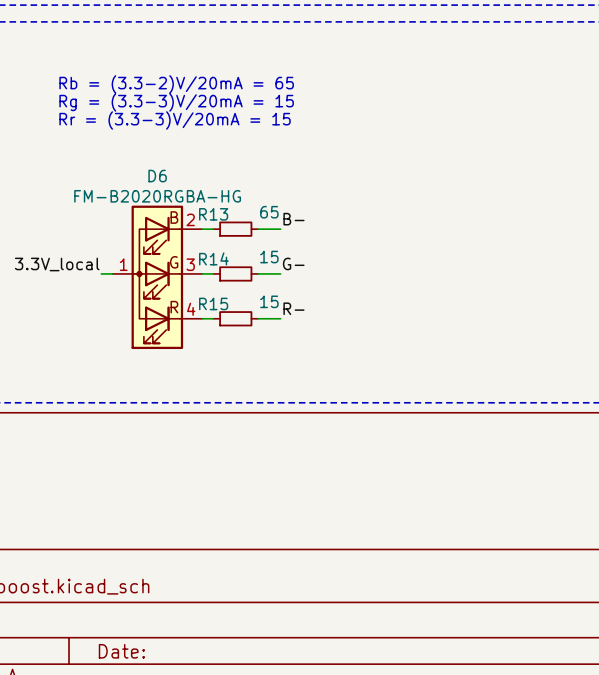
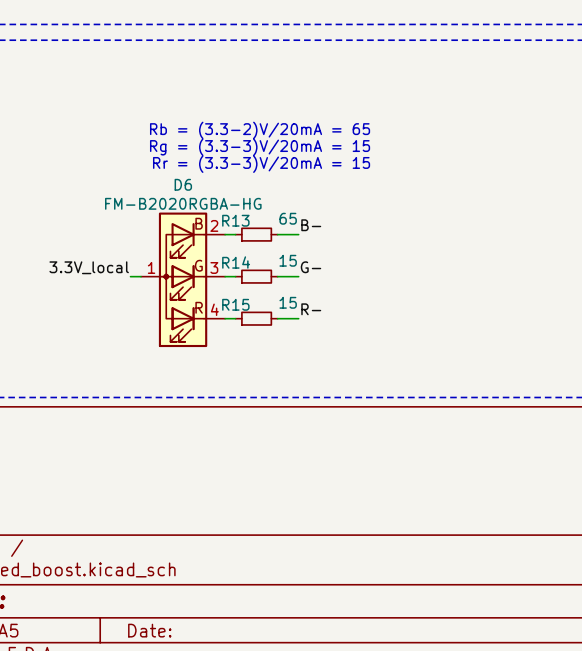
text: Rb = (3.3-2)V/20mA = 65 (176, 84) -> none
text: Rg = (3.3-3)V/20mA = 15 (176, 102) -> none
text: none -> Rb = (3.3-2)V/20mA = 65 (260, 130)
text: Rr = (3.3-3)V/20mA = 15 (175, 120) -> none
text: none -> Rg = (3.3-3)V/20mA = 15 (260, 147)
text: none -> Rr = (3.3-3)V/20mA = 15 (261, 164)

